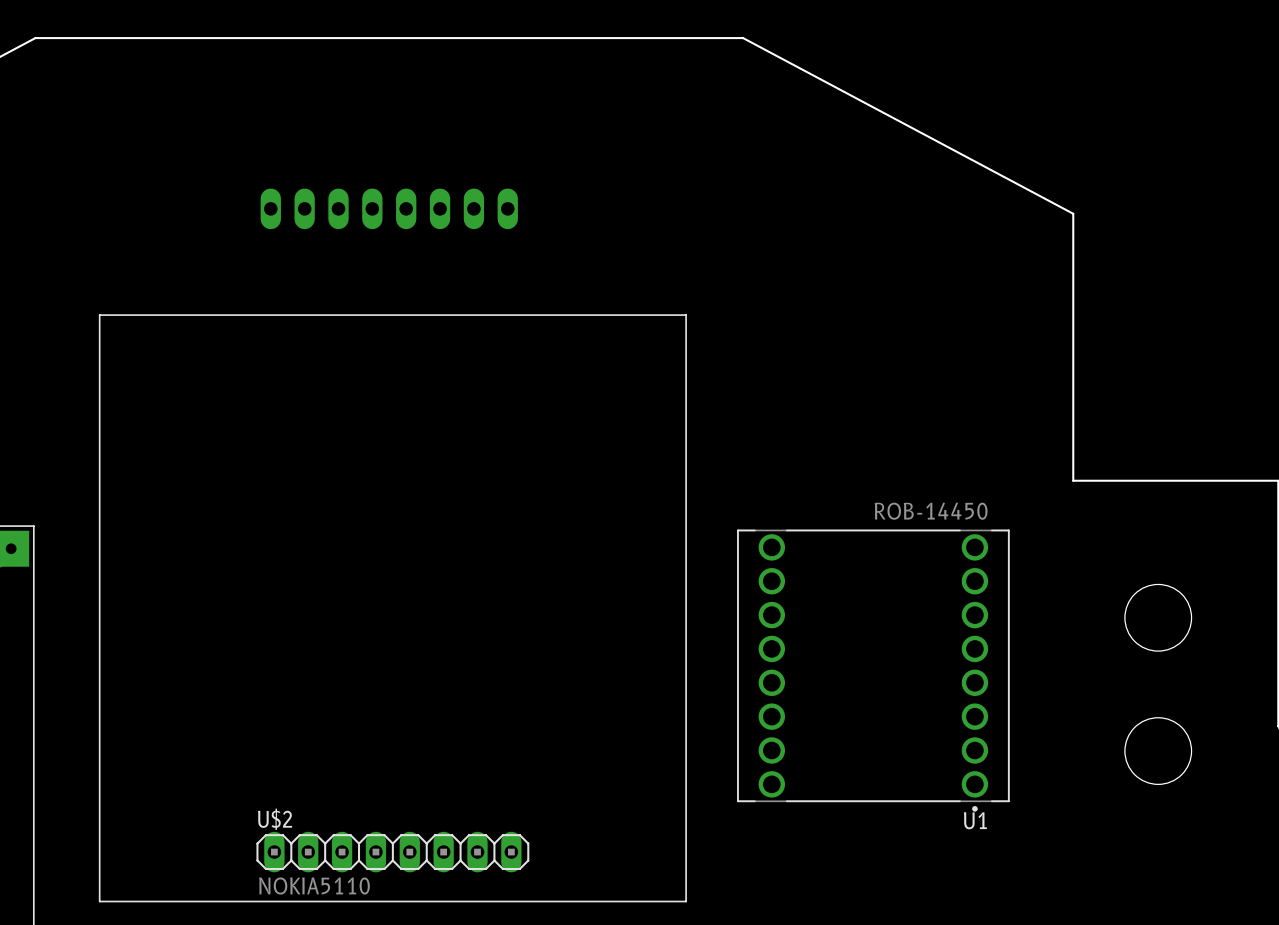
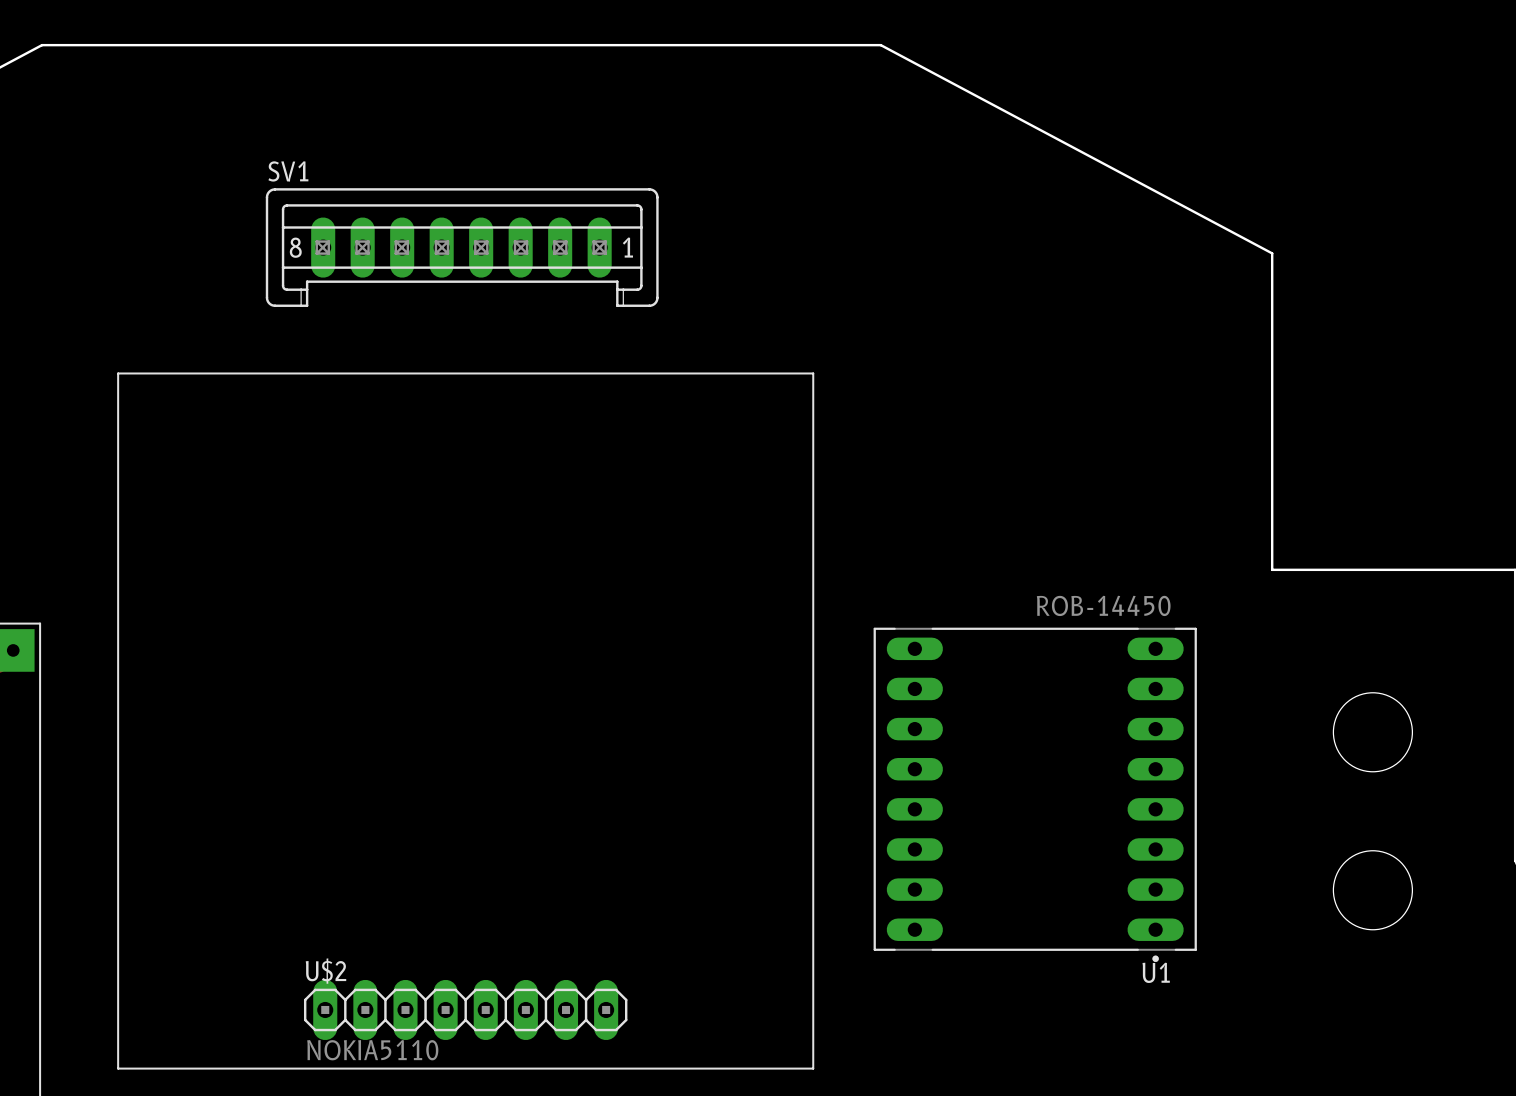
part: (389, 208) -> none
SV1: none -> (462, 247)
U$2 footprint: [98, 314, 687, 903] -> [117, 372, 815, 1070]
U1 footprint: [737, 529, 1010, 812] -> [873, 627, 1197, 962]

